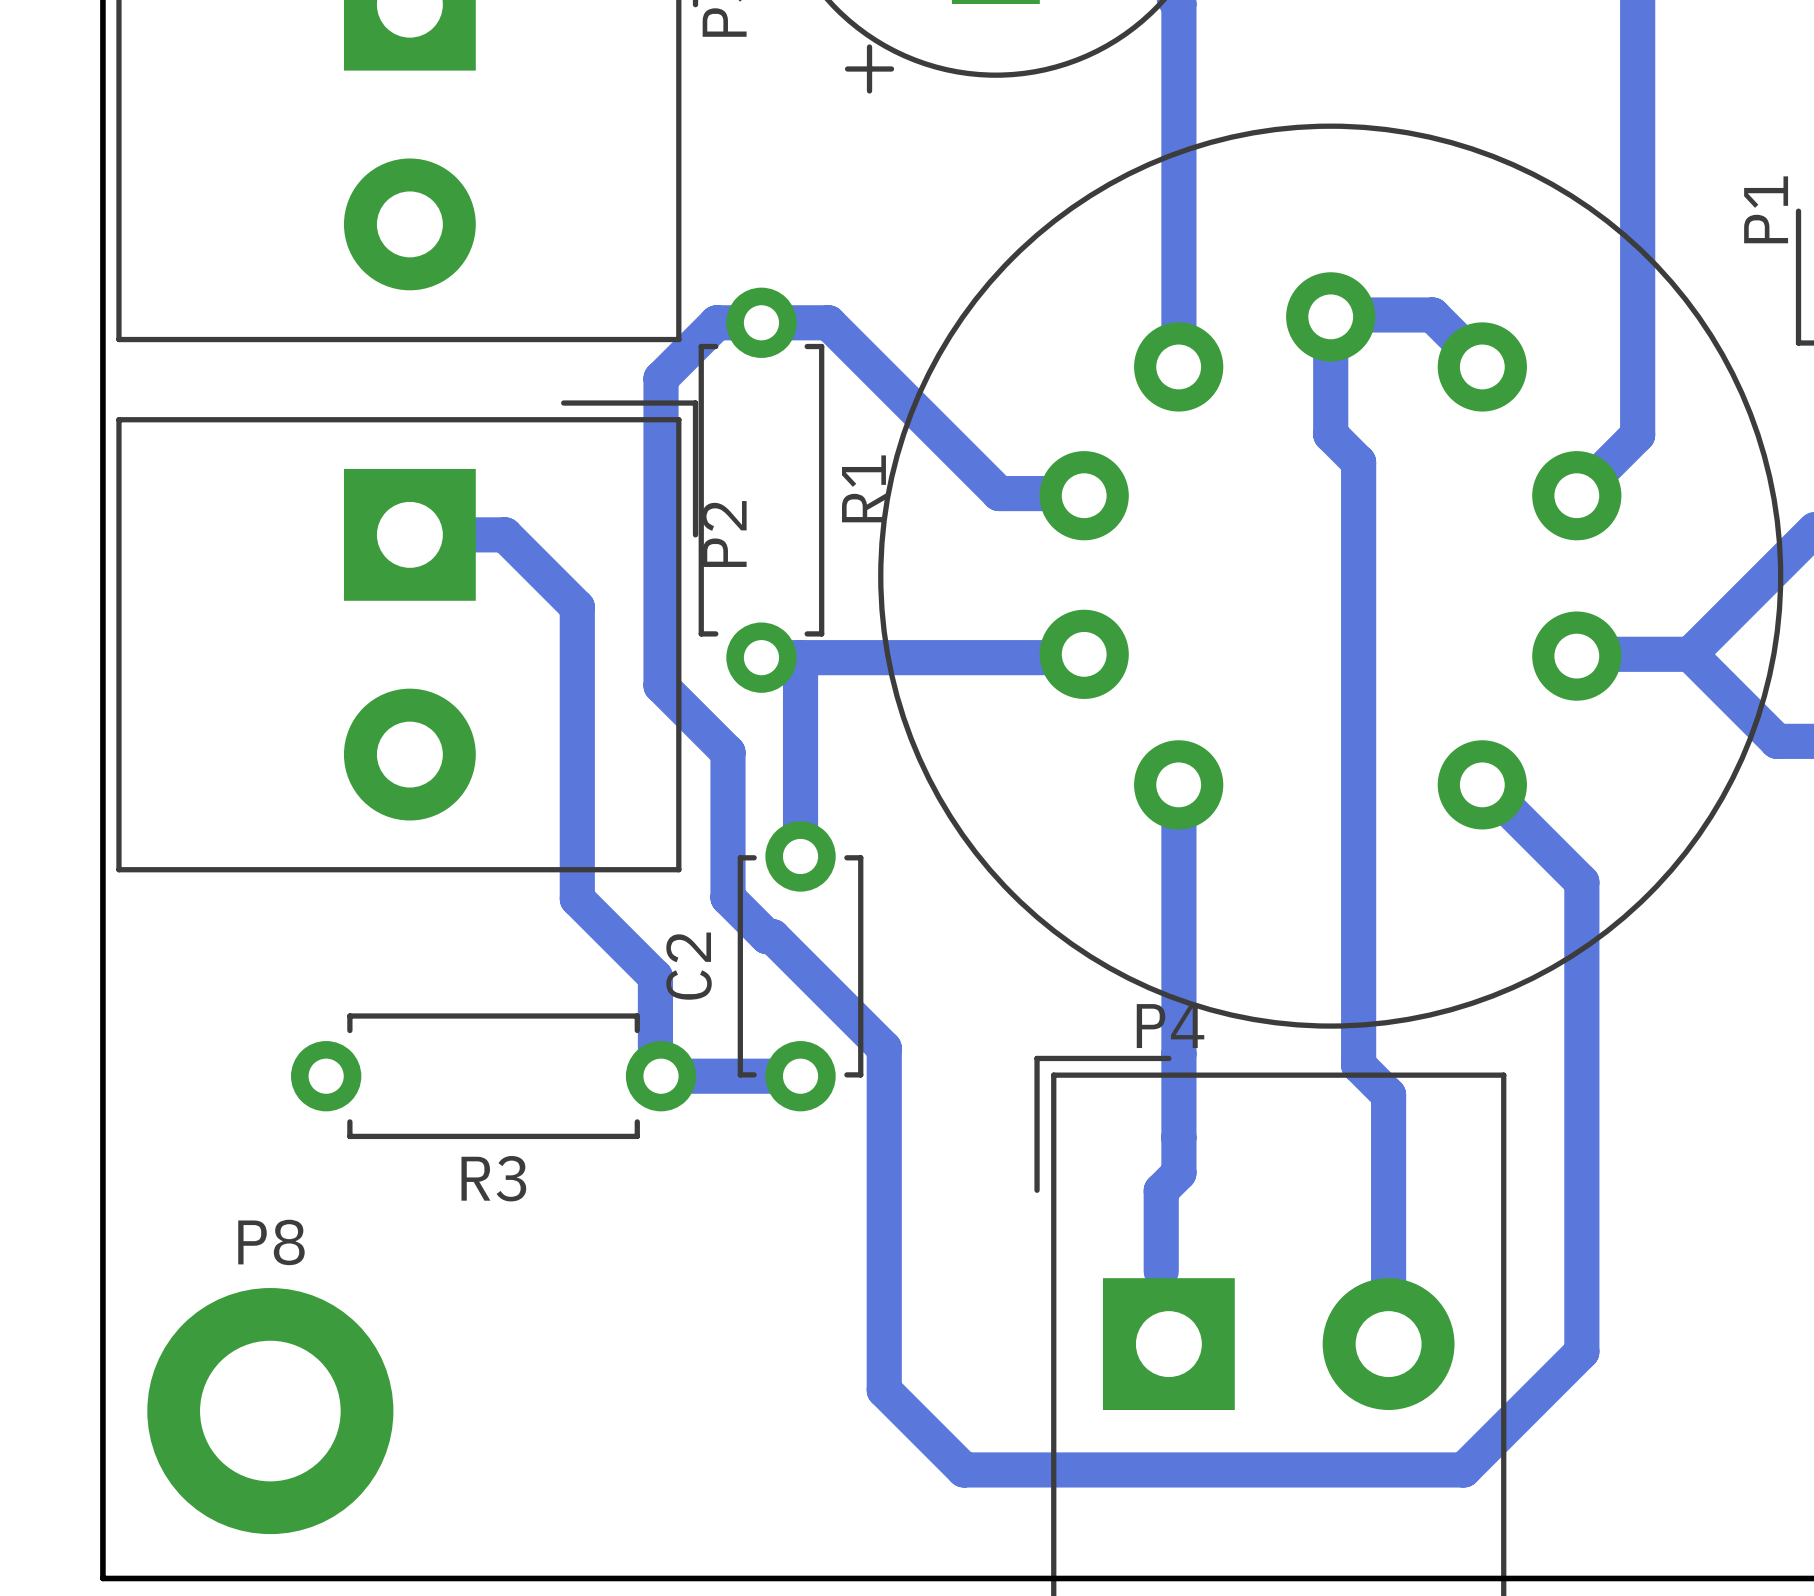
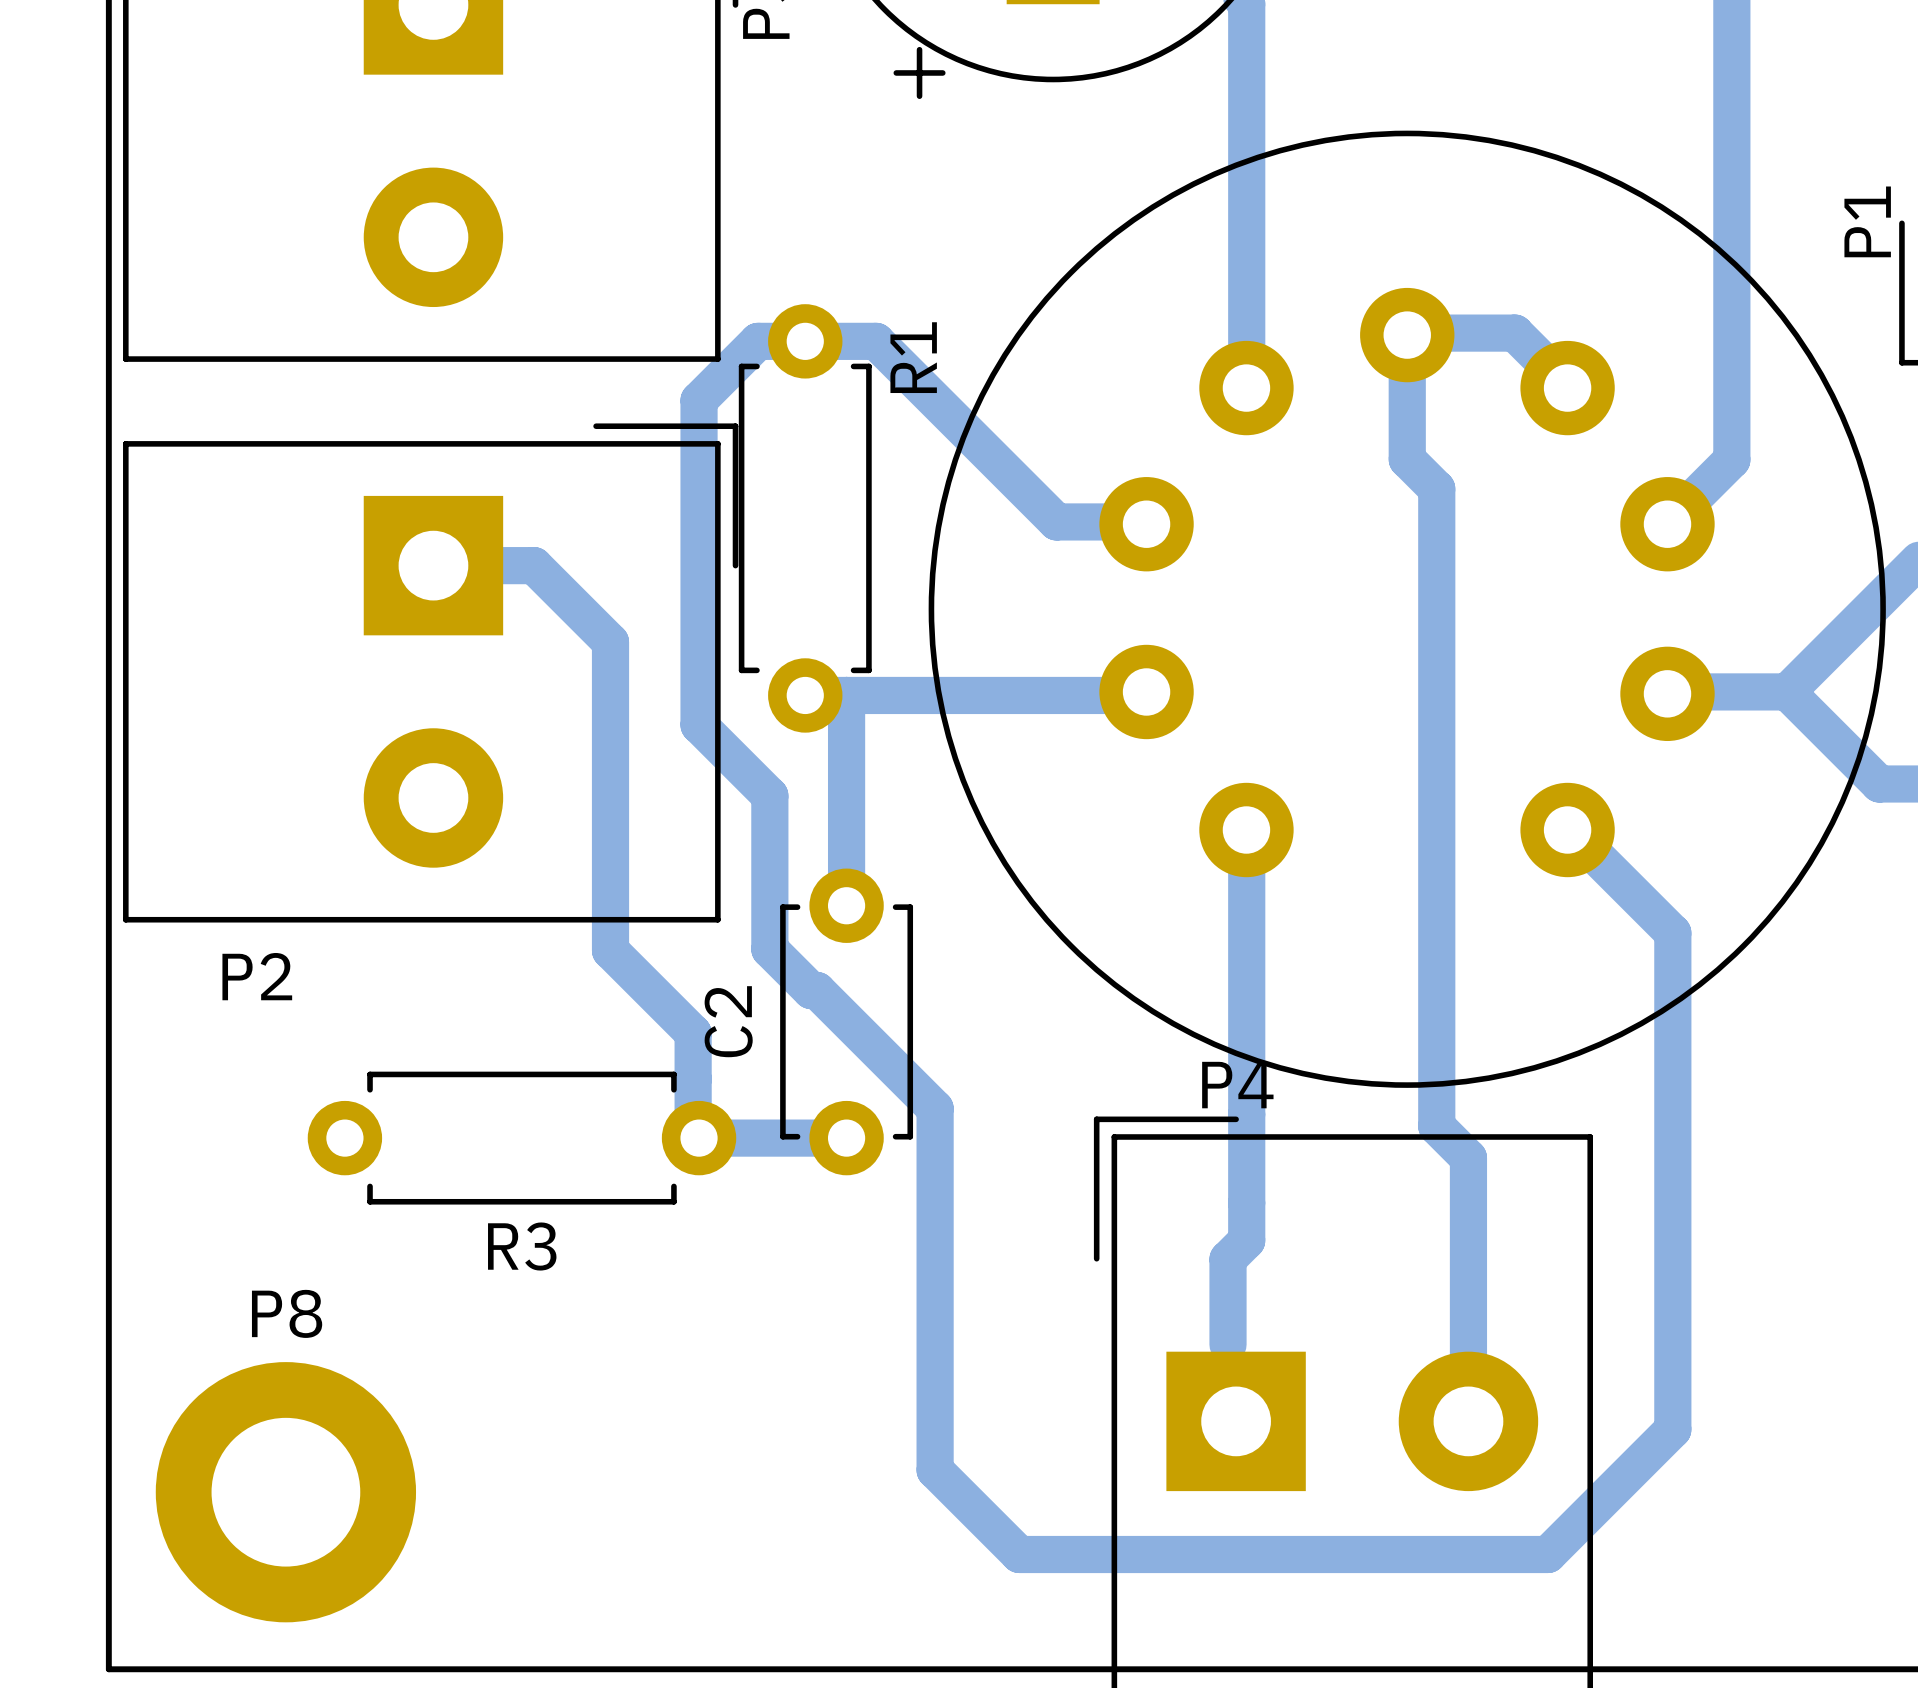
R1 name position: R1 (863, 488) -> R1 (913, 357)
P2 name rotation: 0° (724, 534) -> 90° clockwise (257, 976)
P2 name position: P2 (724, 534) -> P2 (257, 976)

